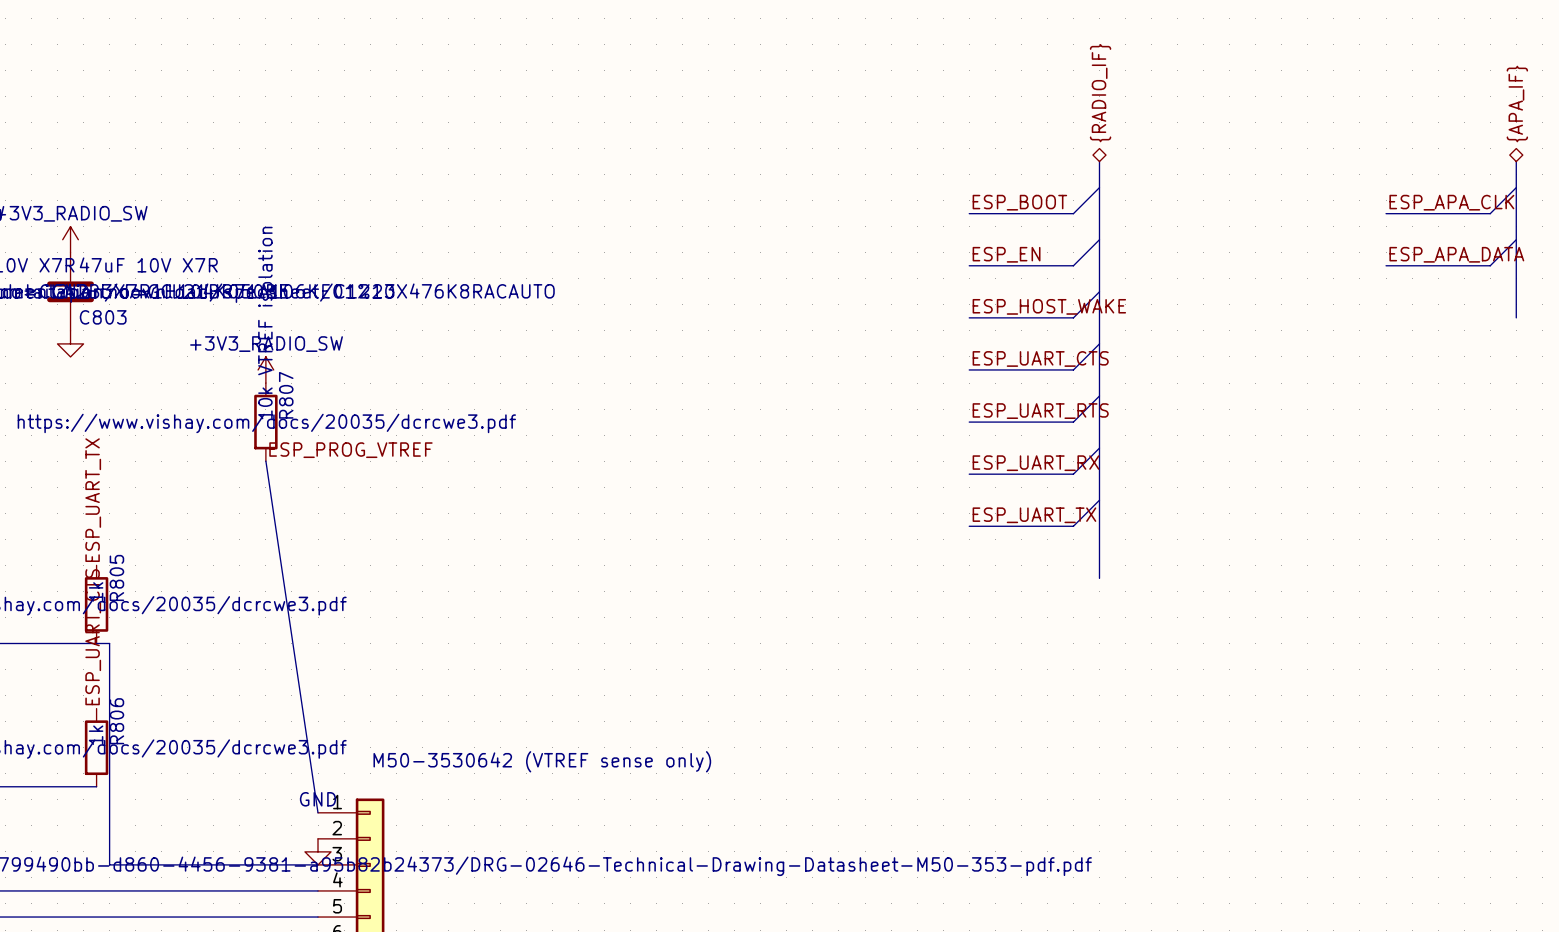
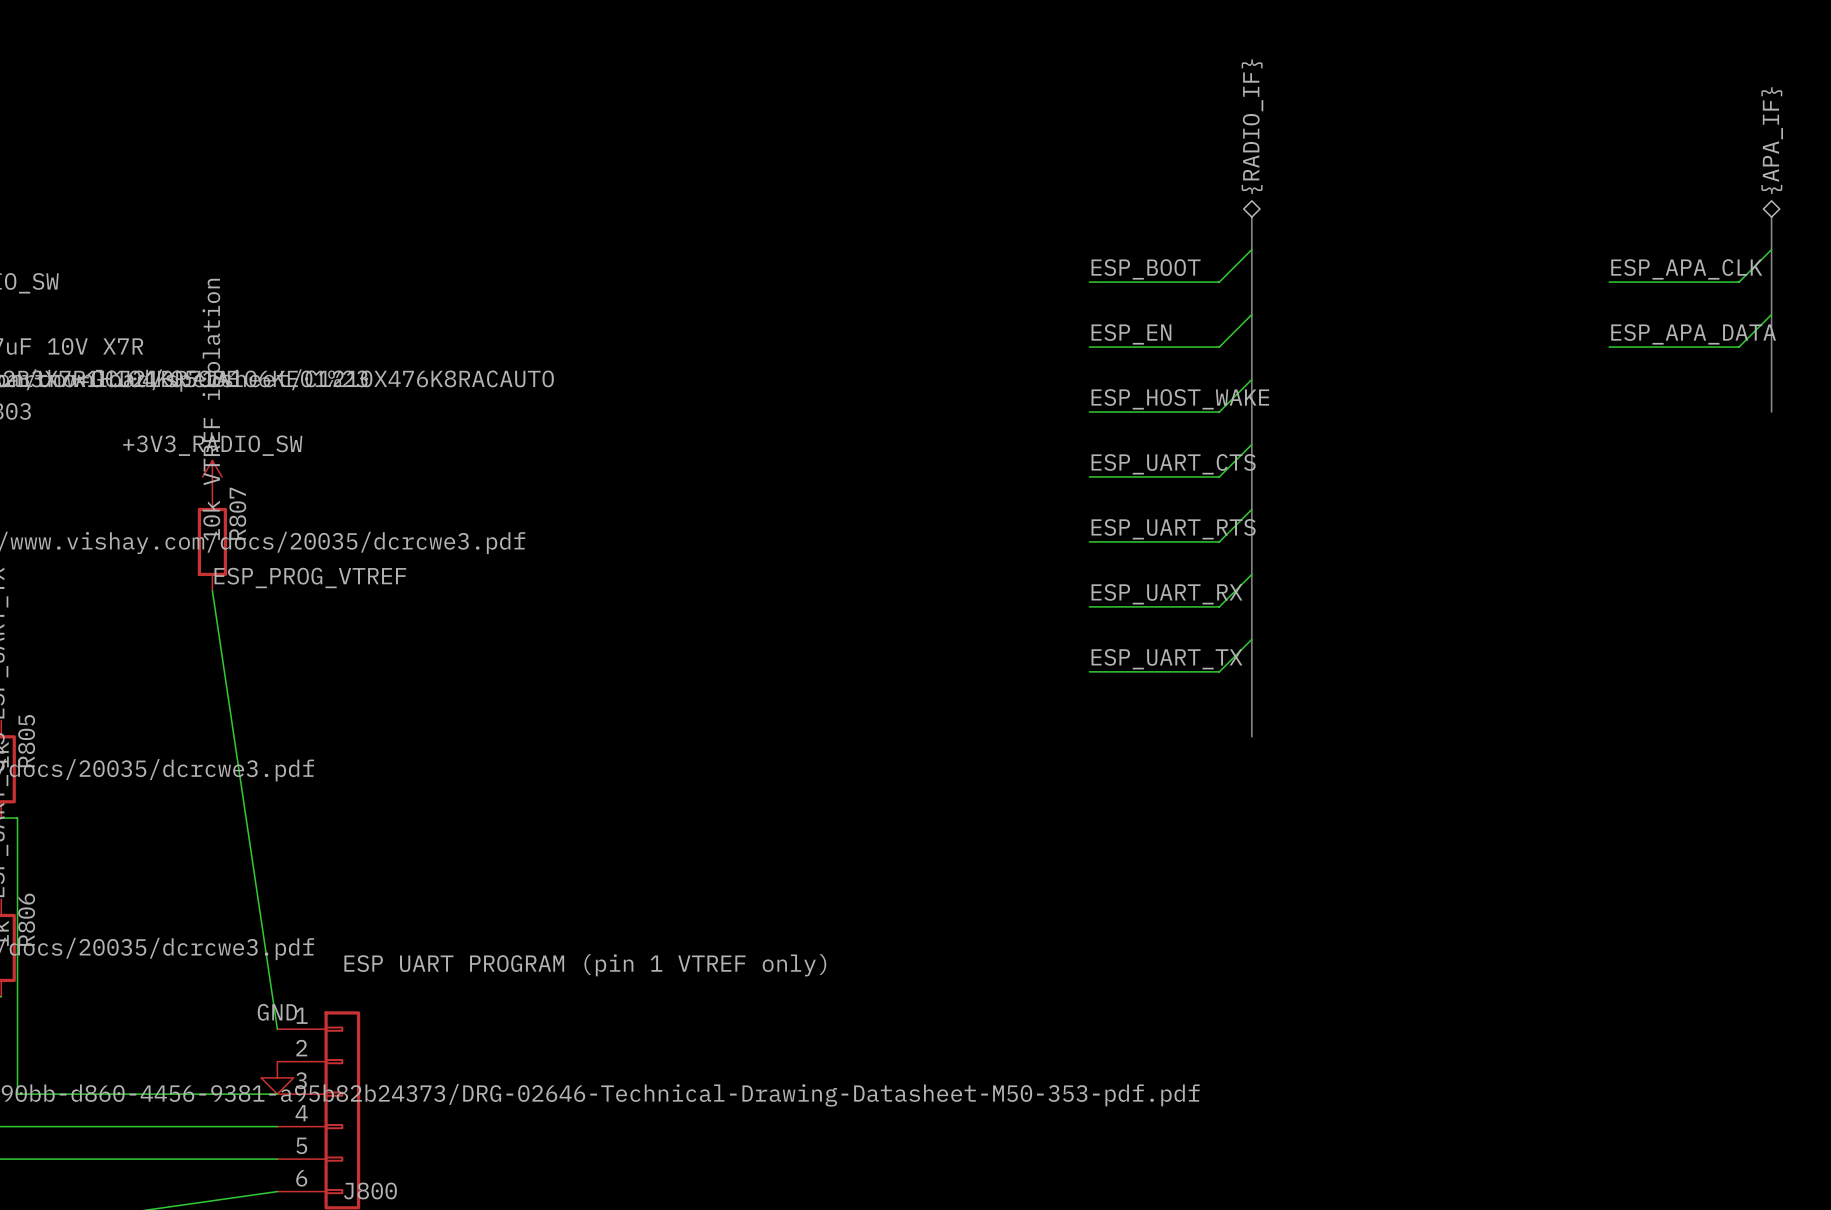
J800 value: M50-3530642 (VTREF sense only) (542, 761) -> ESP UART PROGRAM (pin 1 VTREF only) (585, 965)

